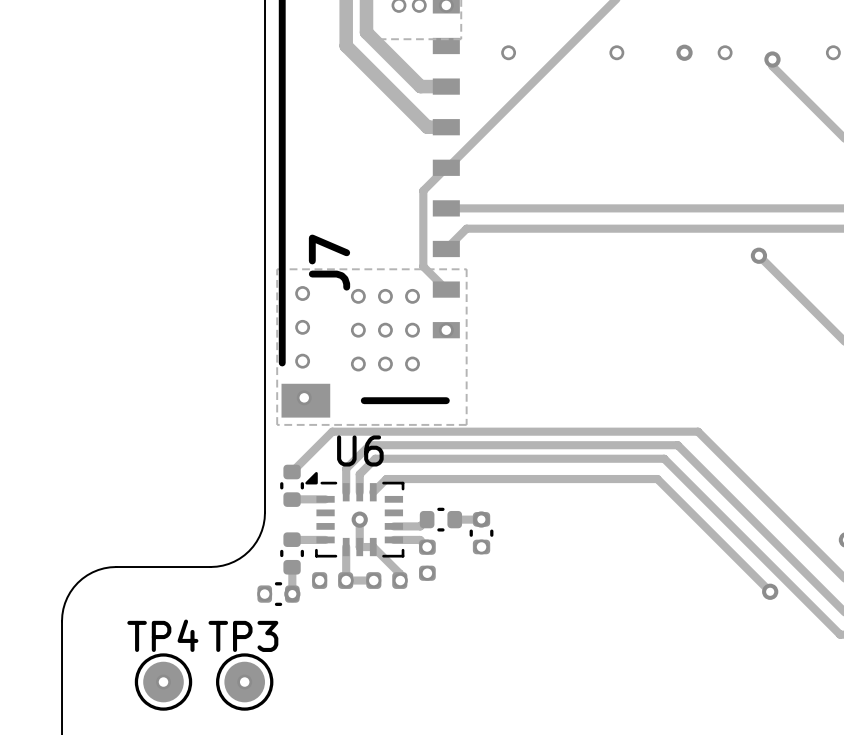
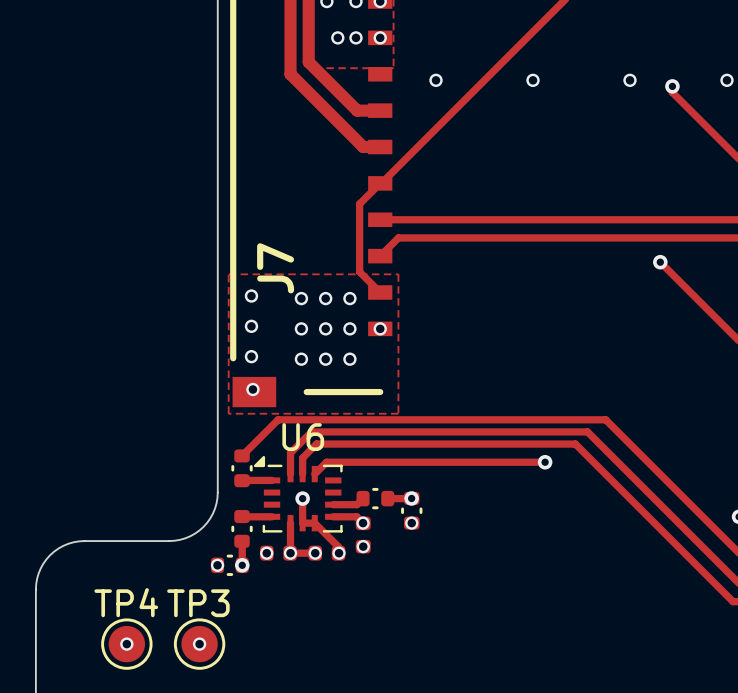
via: (684, 52) -> none
track: (630, 479) (657, 479) (770, 591) -> none
via: none -> (545, 462)
via: (770, 591) -> none

